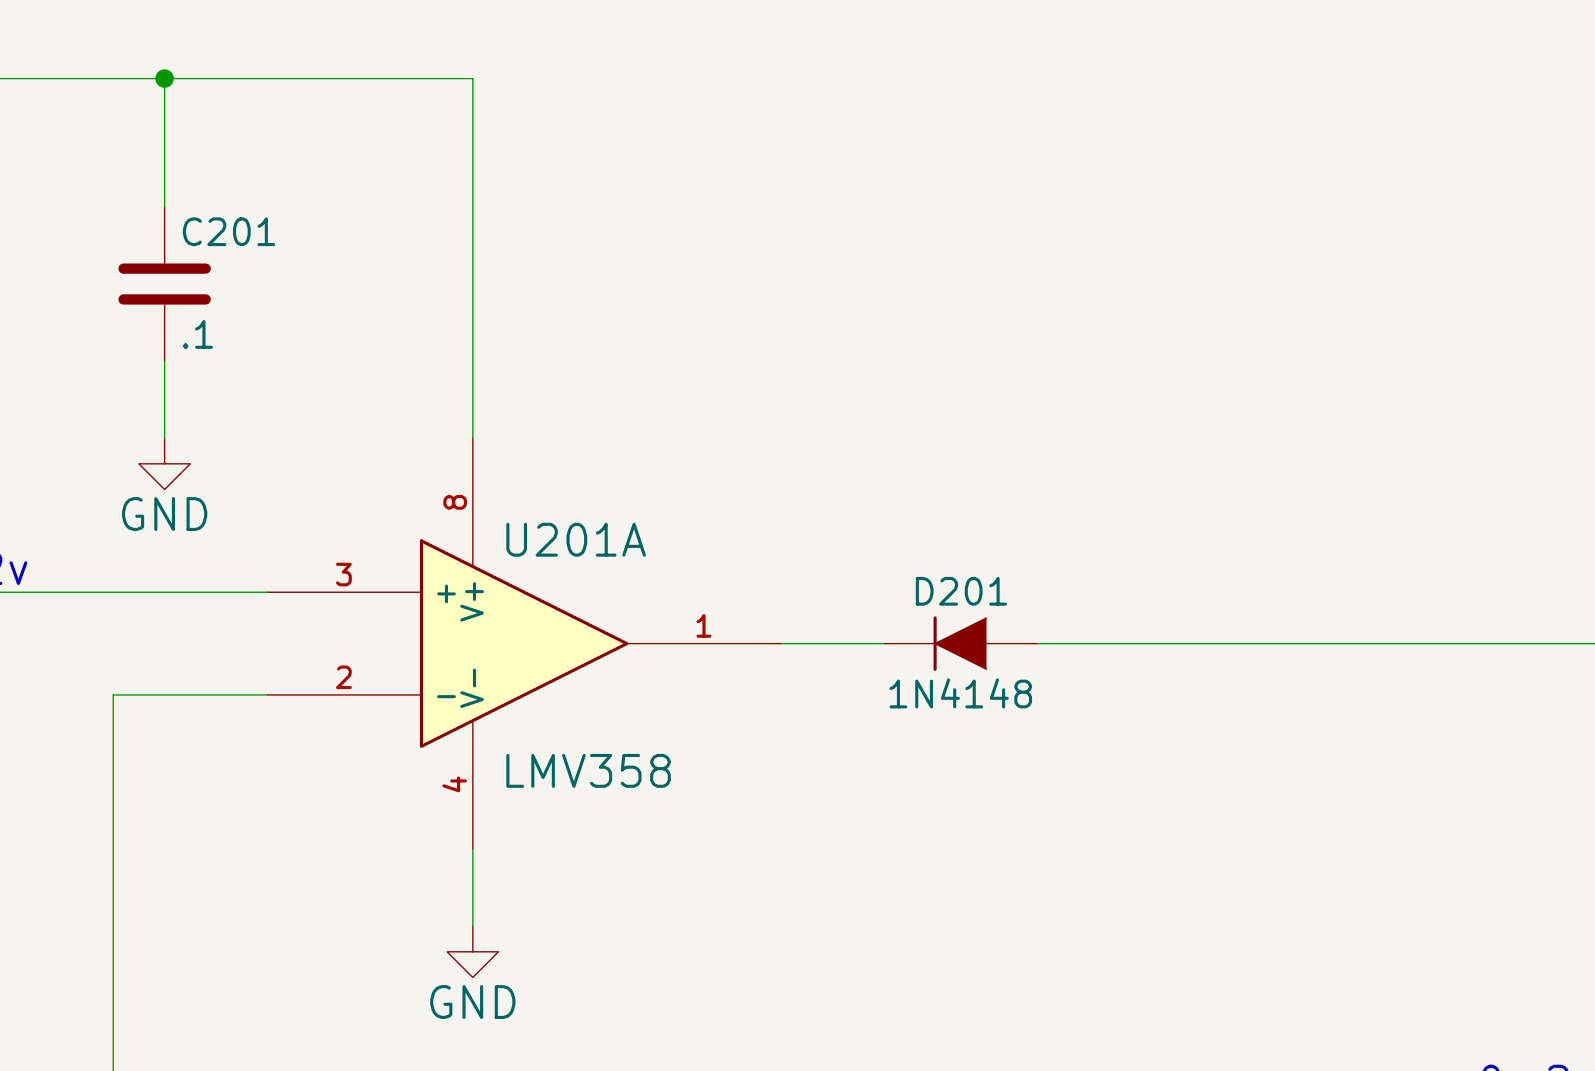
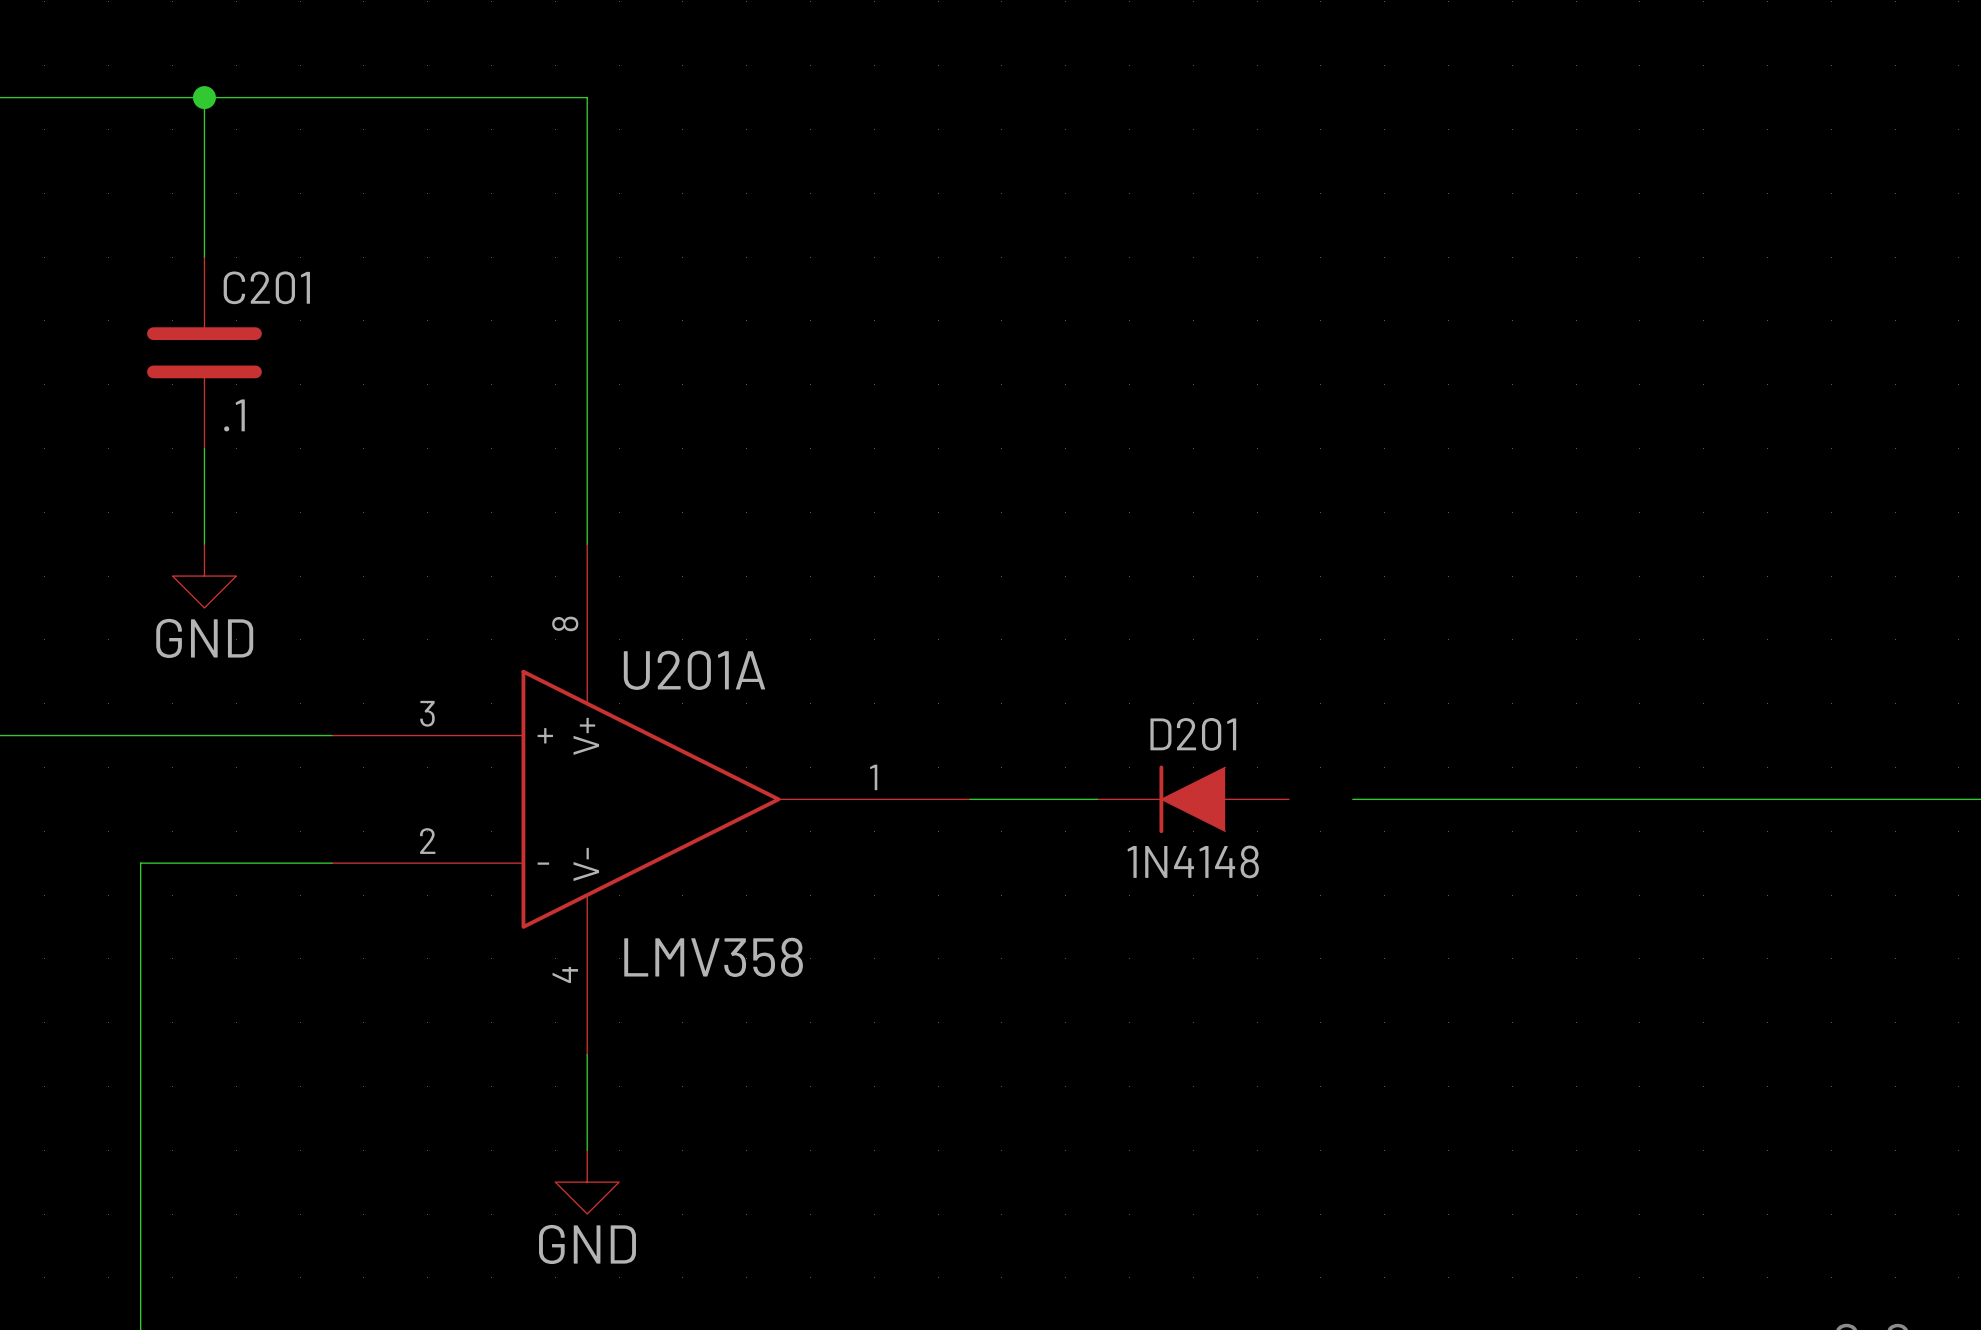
wire: (1037, 643) (1089, 643) -> none

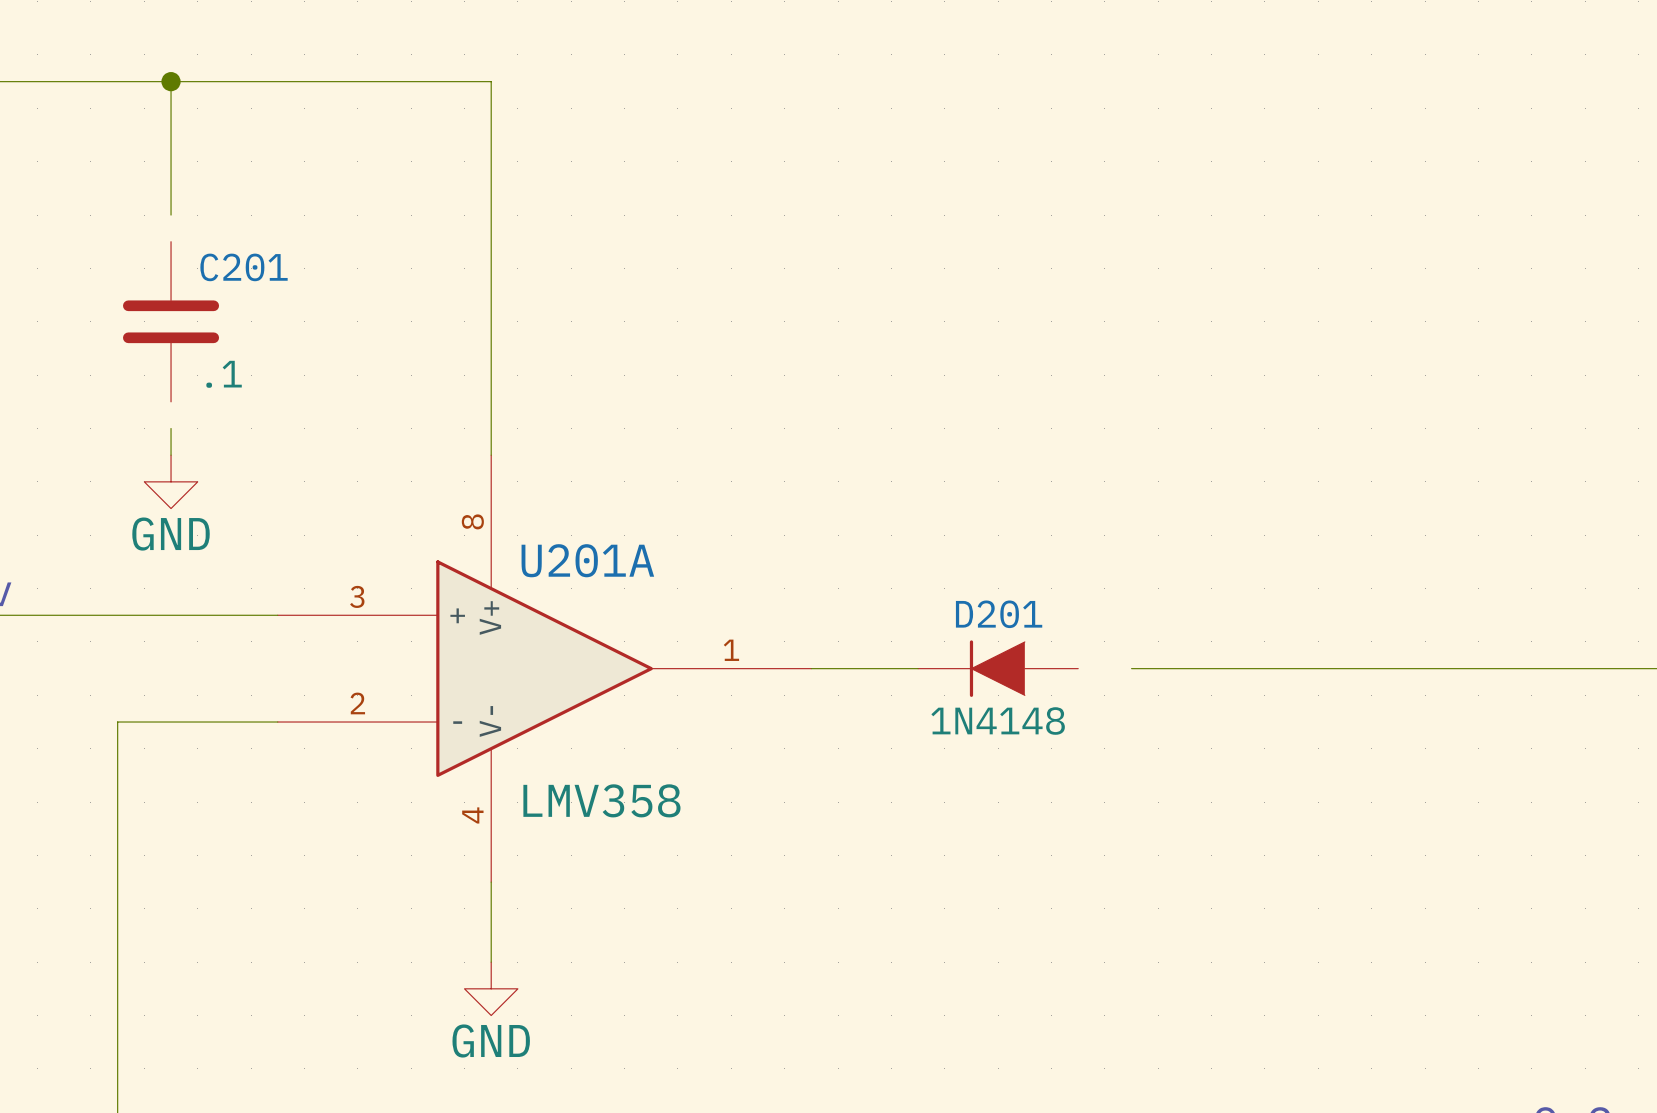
C201 name position: C201 (266, 287) -> C201 (244, 267)
C201 position: (204, 352) -> (171, 321)
C201 value position: .1 (234, 415) -> .1 (224, 374)
wire: (204, 448) (204, 512) -> none

